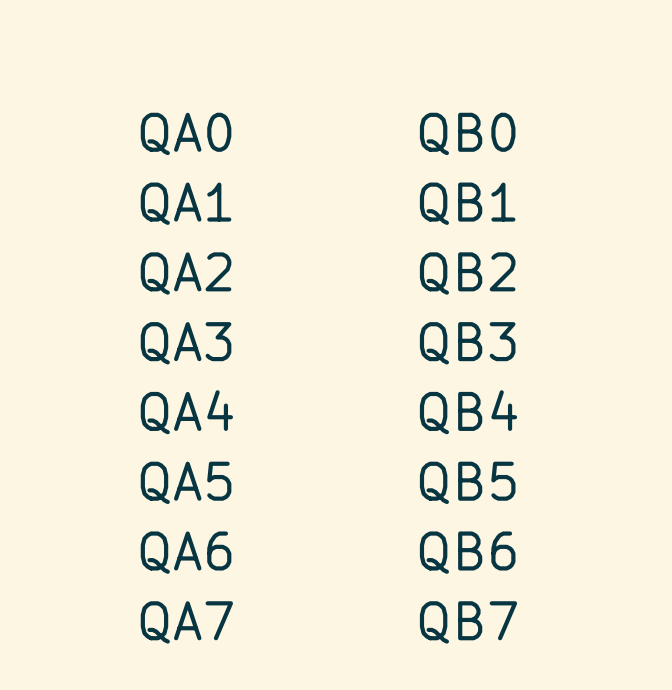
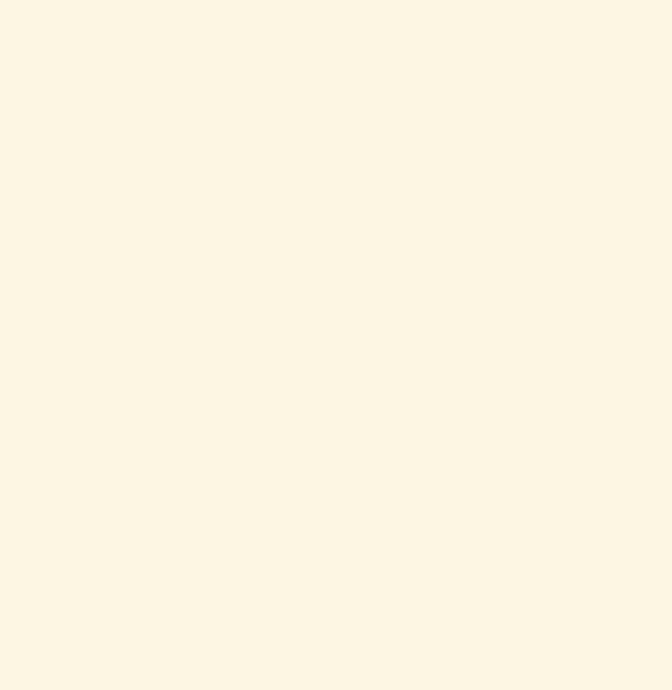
label: QA0 (186, 133) -> none
label: QB0 (467, 133) -> none
label: QA1 (186, 203) -> none
label: QB1 (467, 203) -> none
label: QA2 (186, 273) -> none
label: QB2 (467, 273) -> none
label: QA3 (186, 343) -> none
label: QB3 (467, 343) -> none
label: QA4 (186, 412) -> none
label: QB4 (468, 412) -> none
label: QA5 (186, 482) -> none
label: QB5 (467, 482) -> none
label: QA6 (186, 552) -> none
label: QB6 (467, 552) -> none
label: QA7 (186, 622) -> none
label: QB7 (468, 622) -> none

